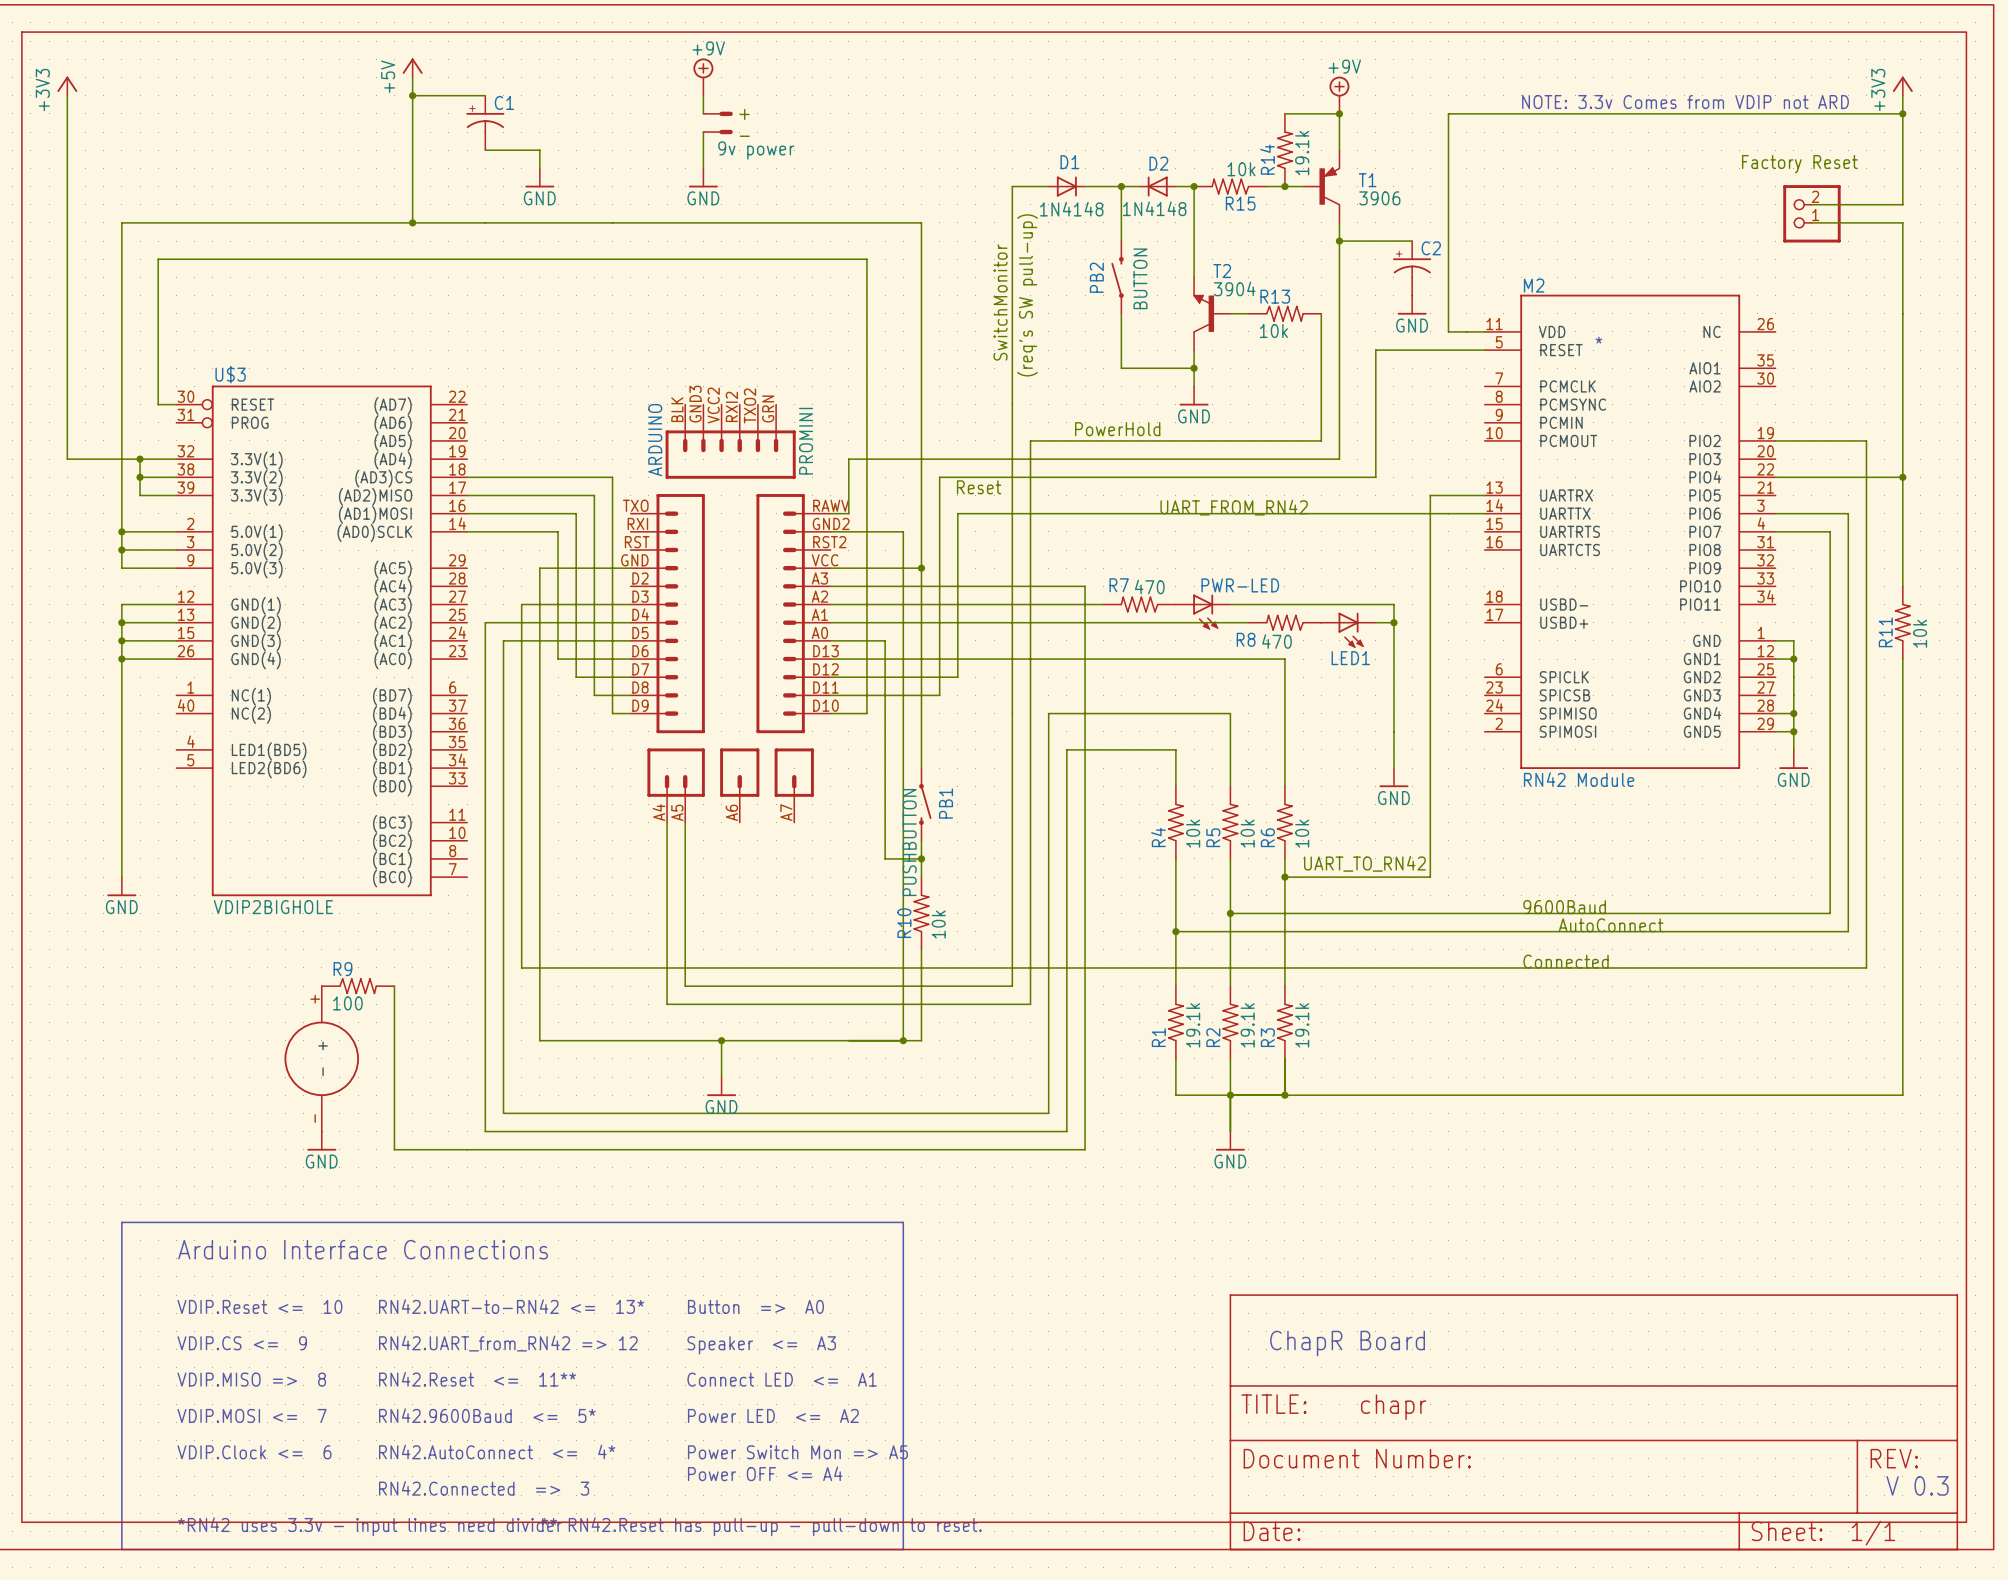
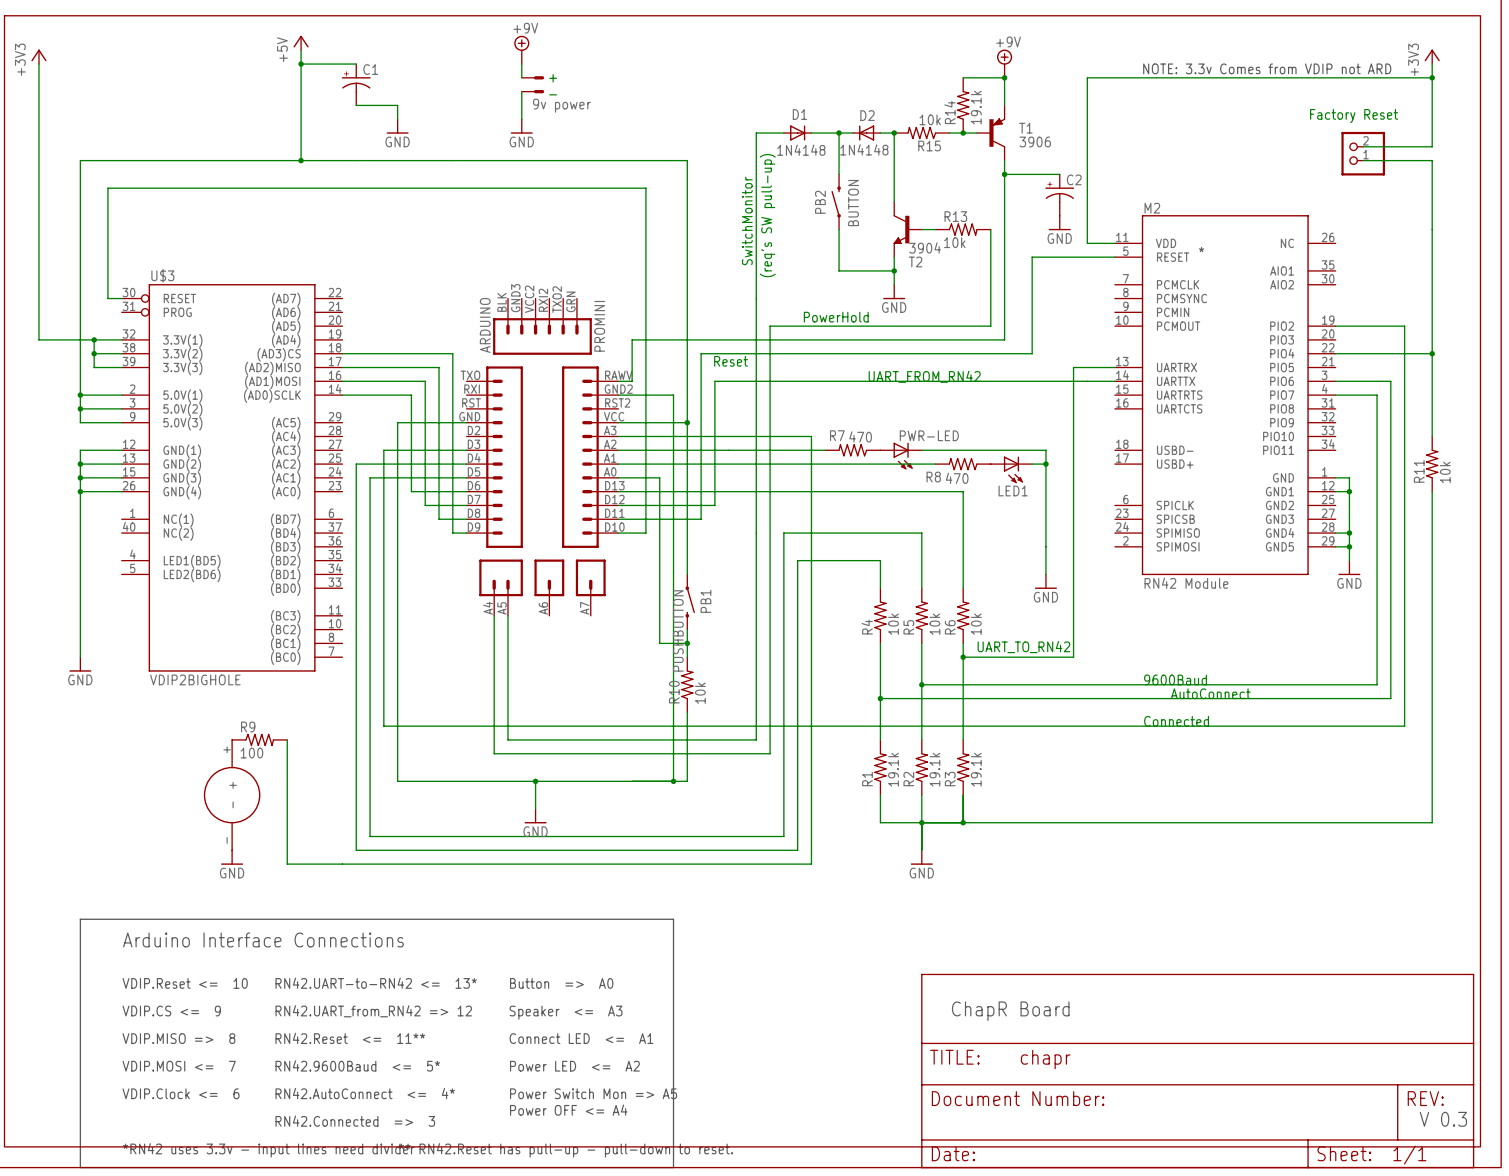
T2 flip: as is (1203, 313) -> up-down (901, 229)

